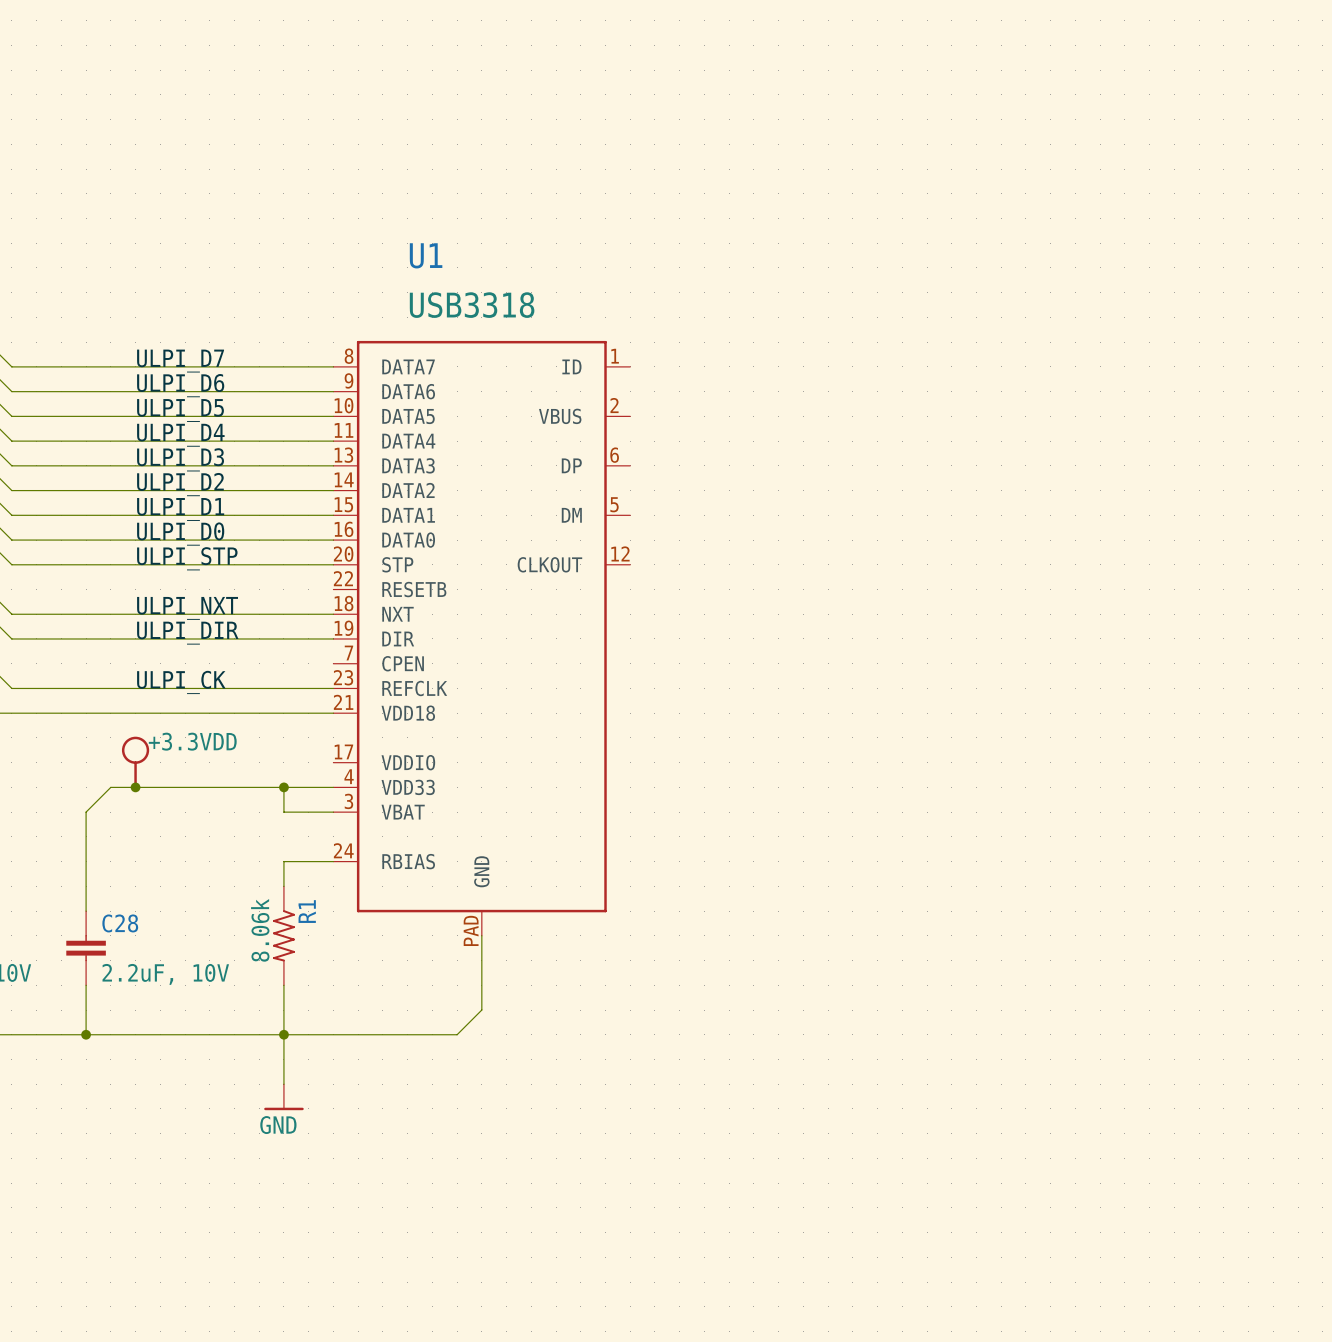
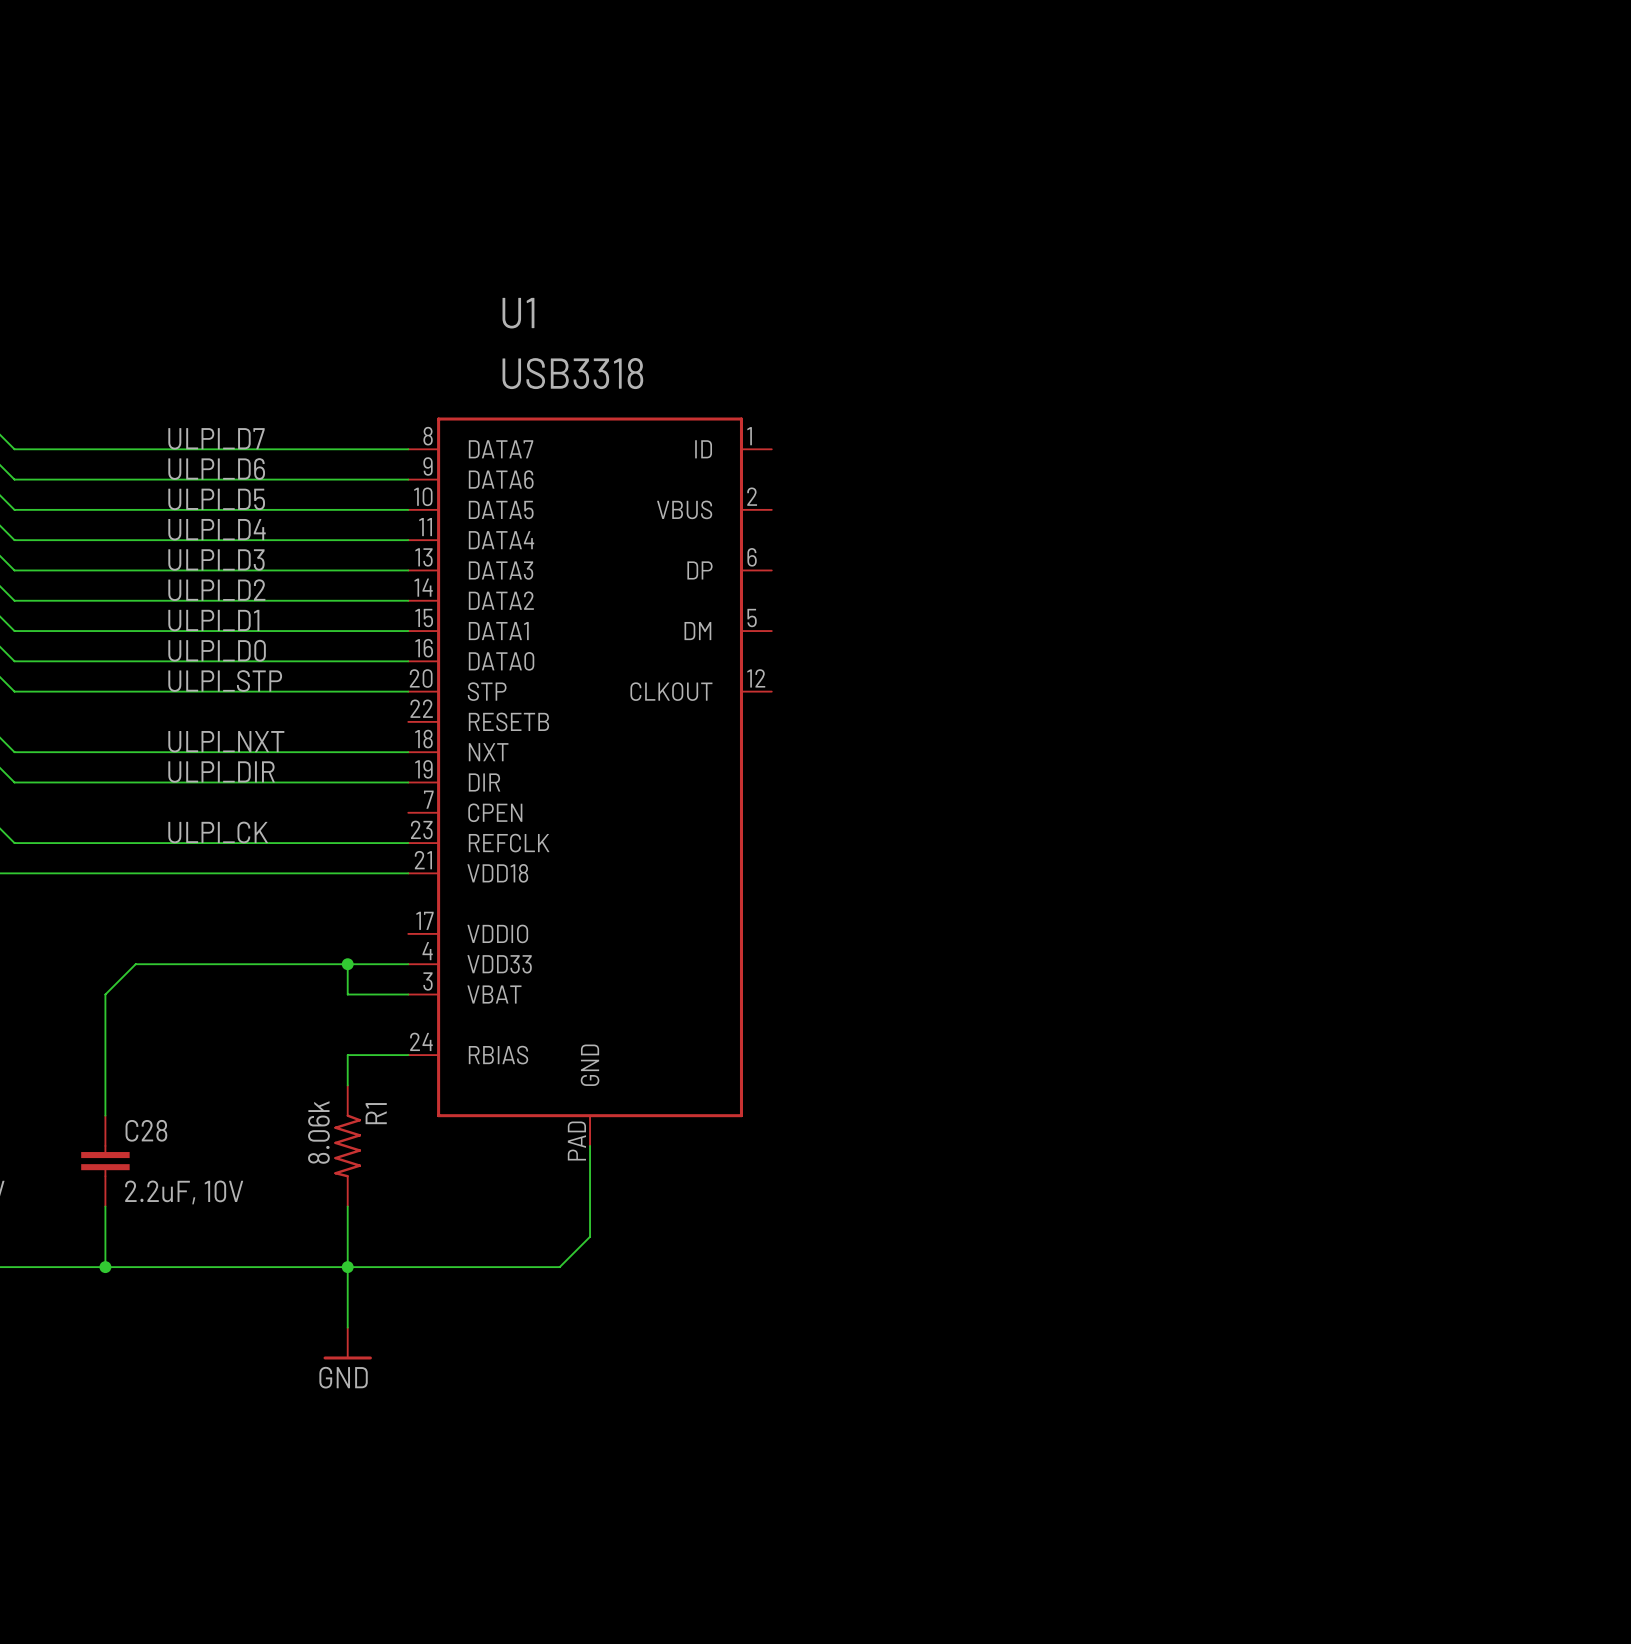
power symbol: +3.3VDD (135, 762) -> none
junction: (135, 787) -> none

